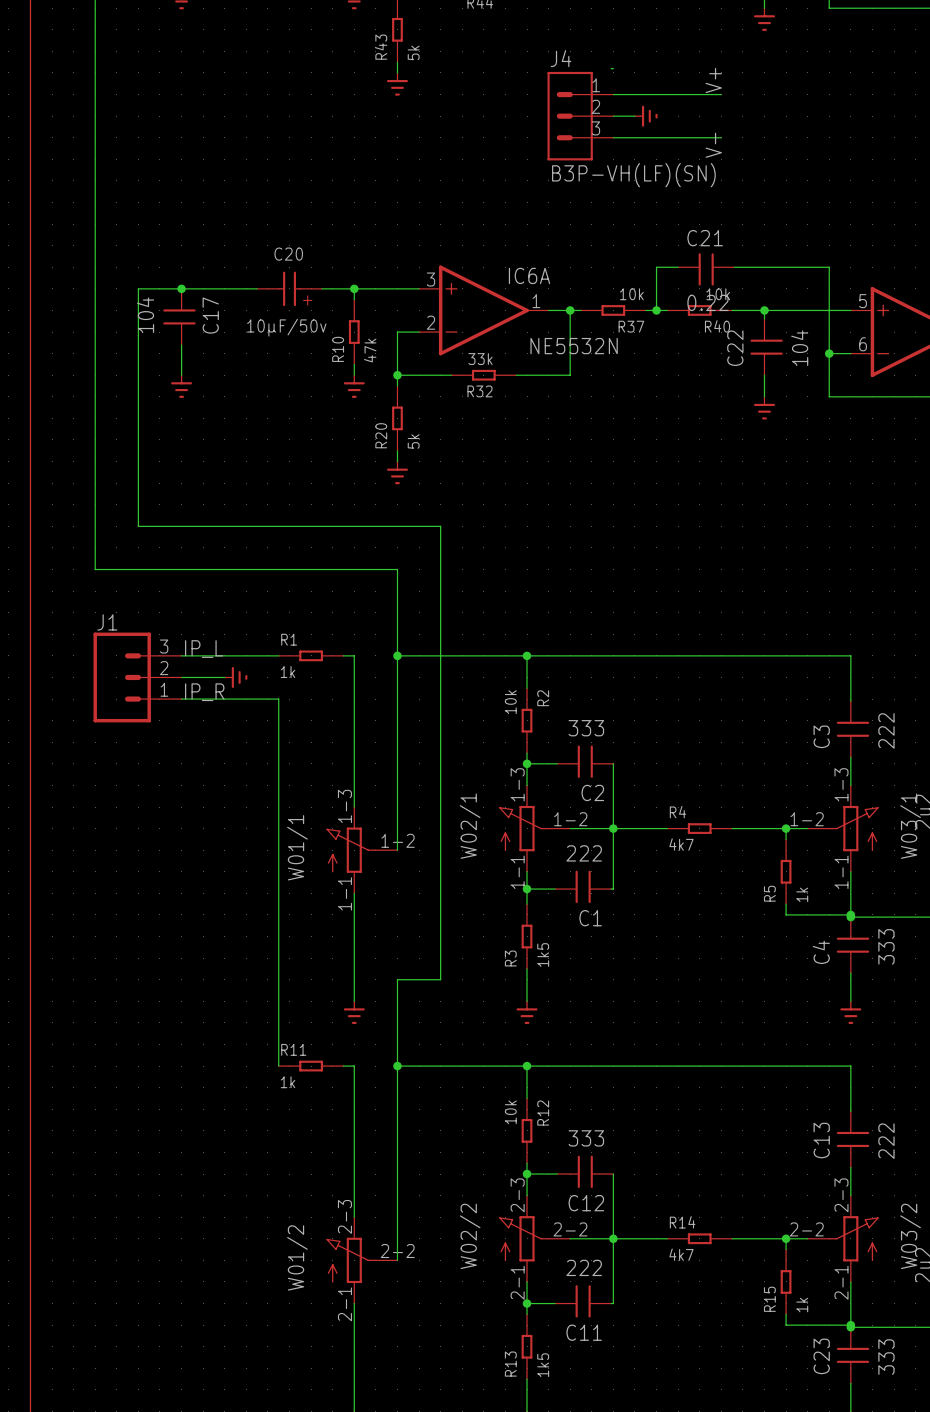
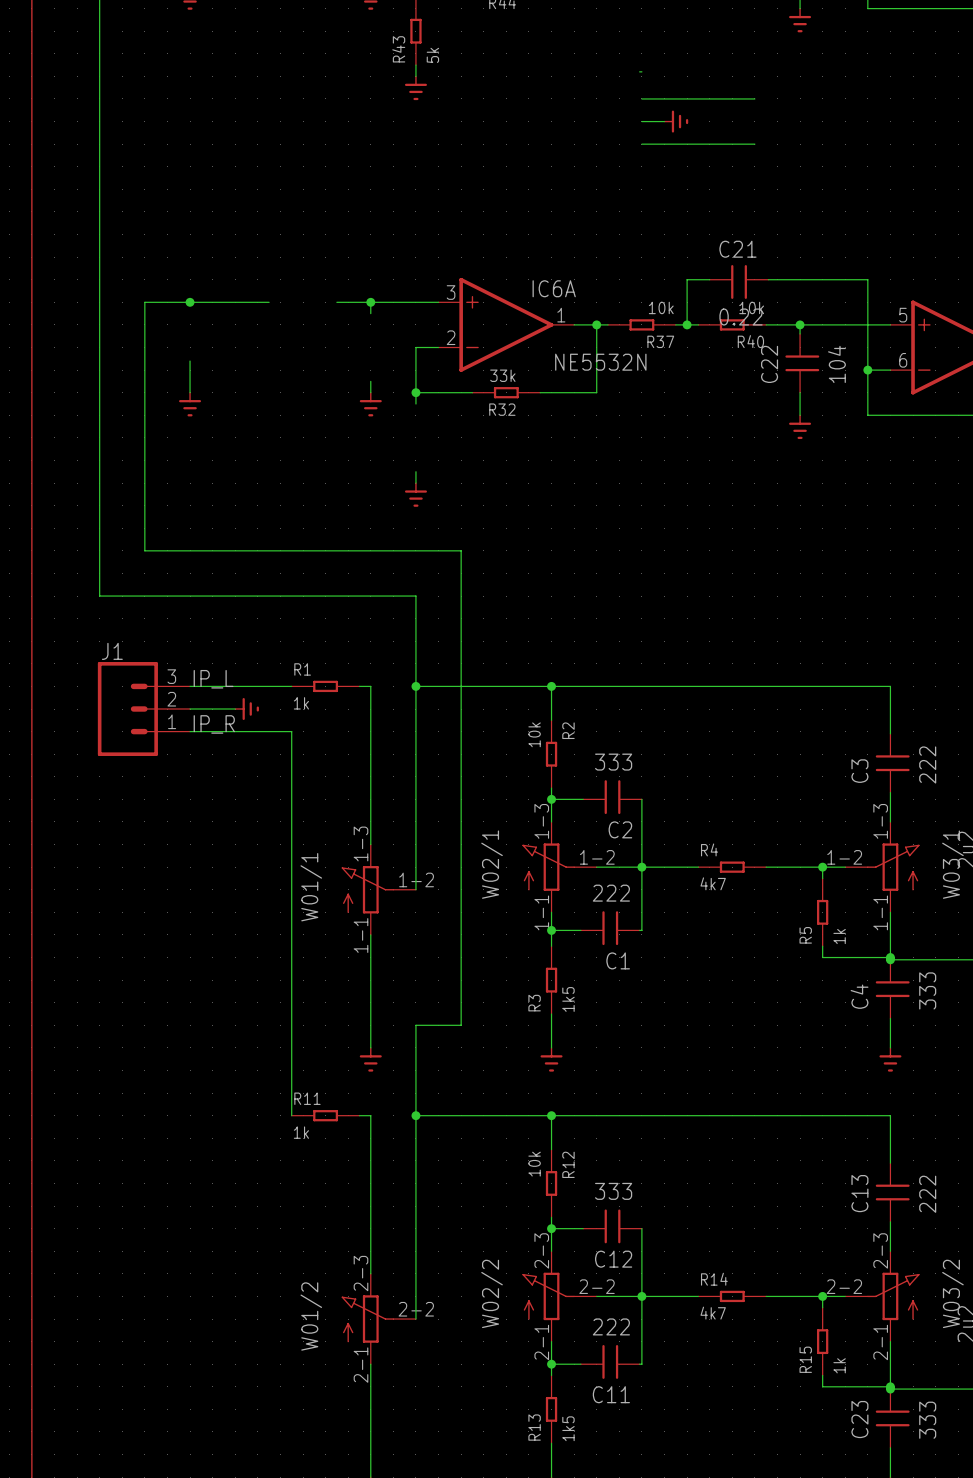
label: V+ (713, 80) -> none
J4: B3P-VH(LF)(SN) (580, 116) -> none
label: V- (713, 145) -> none
C20: 10µF/50v (289, 288) -> none
C17: 104 (179, 316) -> none
R10: 47k (354, 332) -> none
R20: 5k (397, 418) -> none

